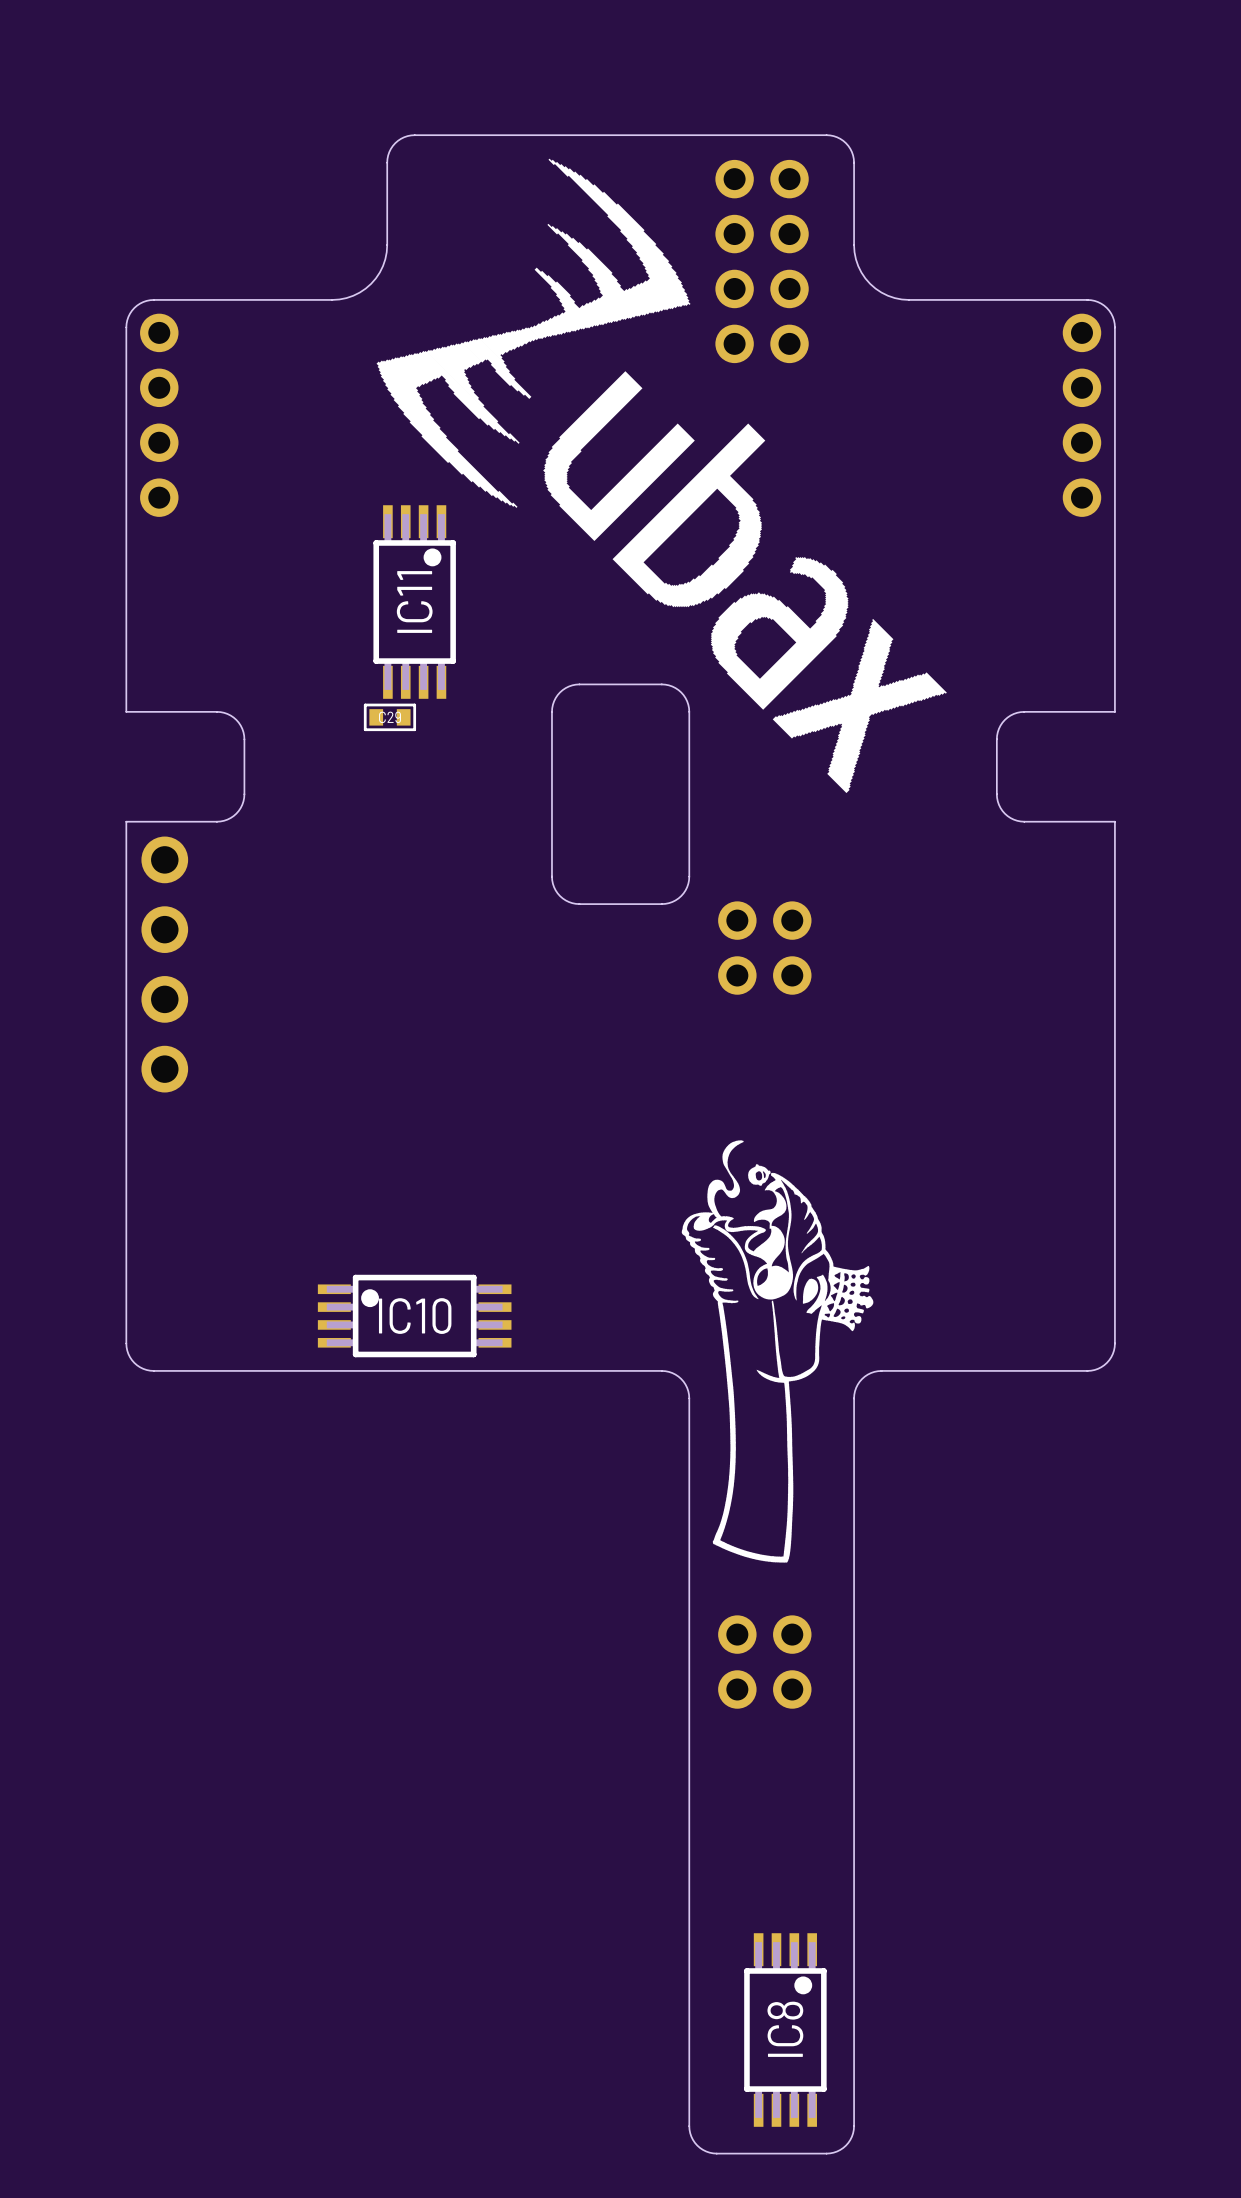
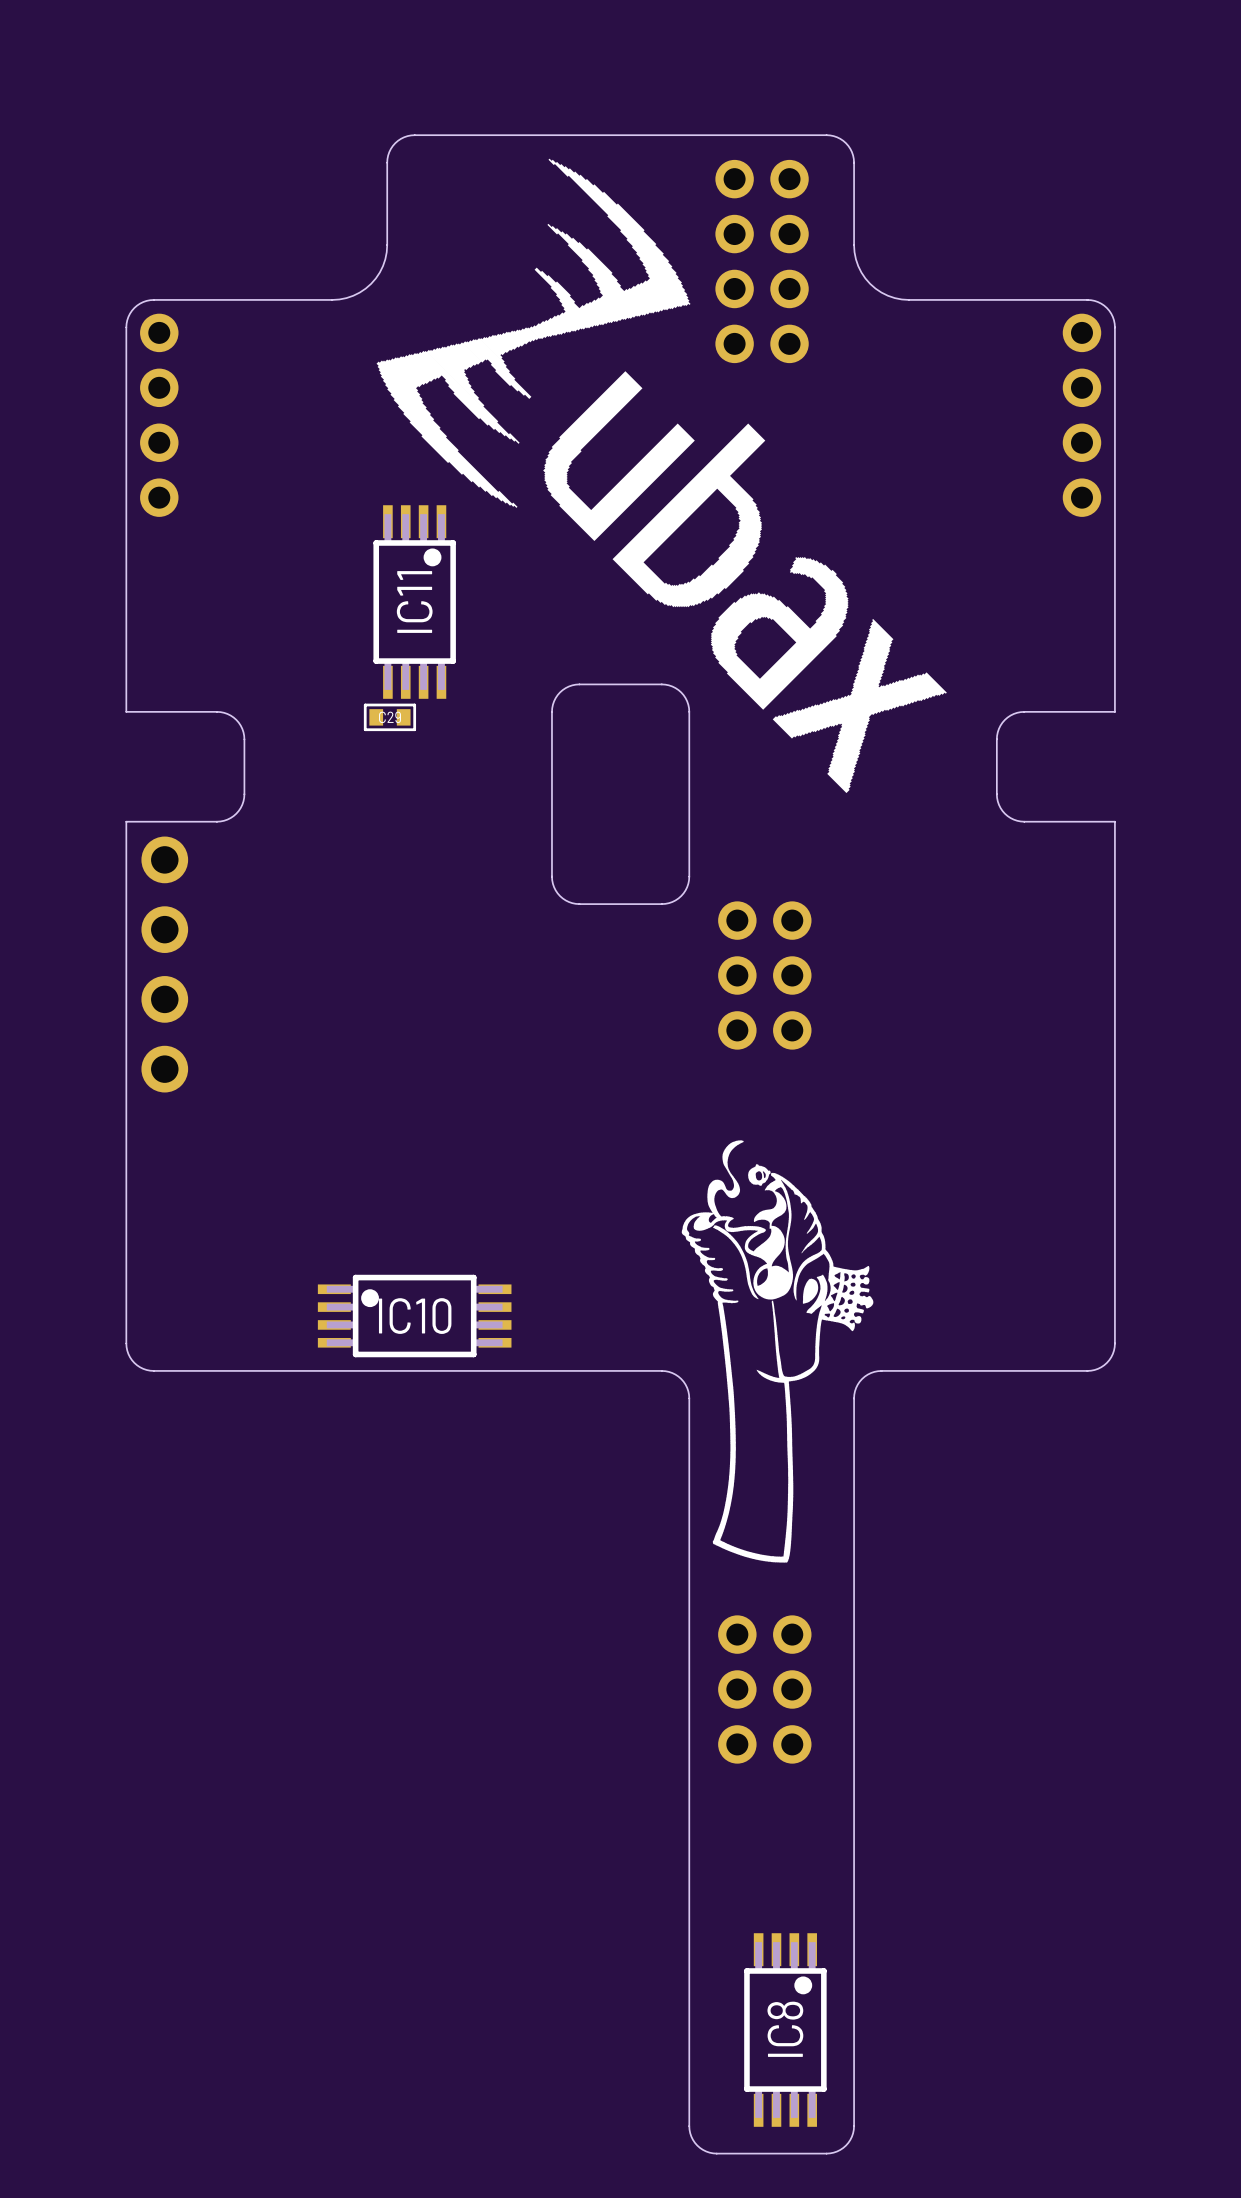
part footprint: [718, 901, 812, 995] -> [718, 901, 812, 1050]
part footprint: [718, 1615, 812, 1709] -> [718, 1615, 812, 1764]

